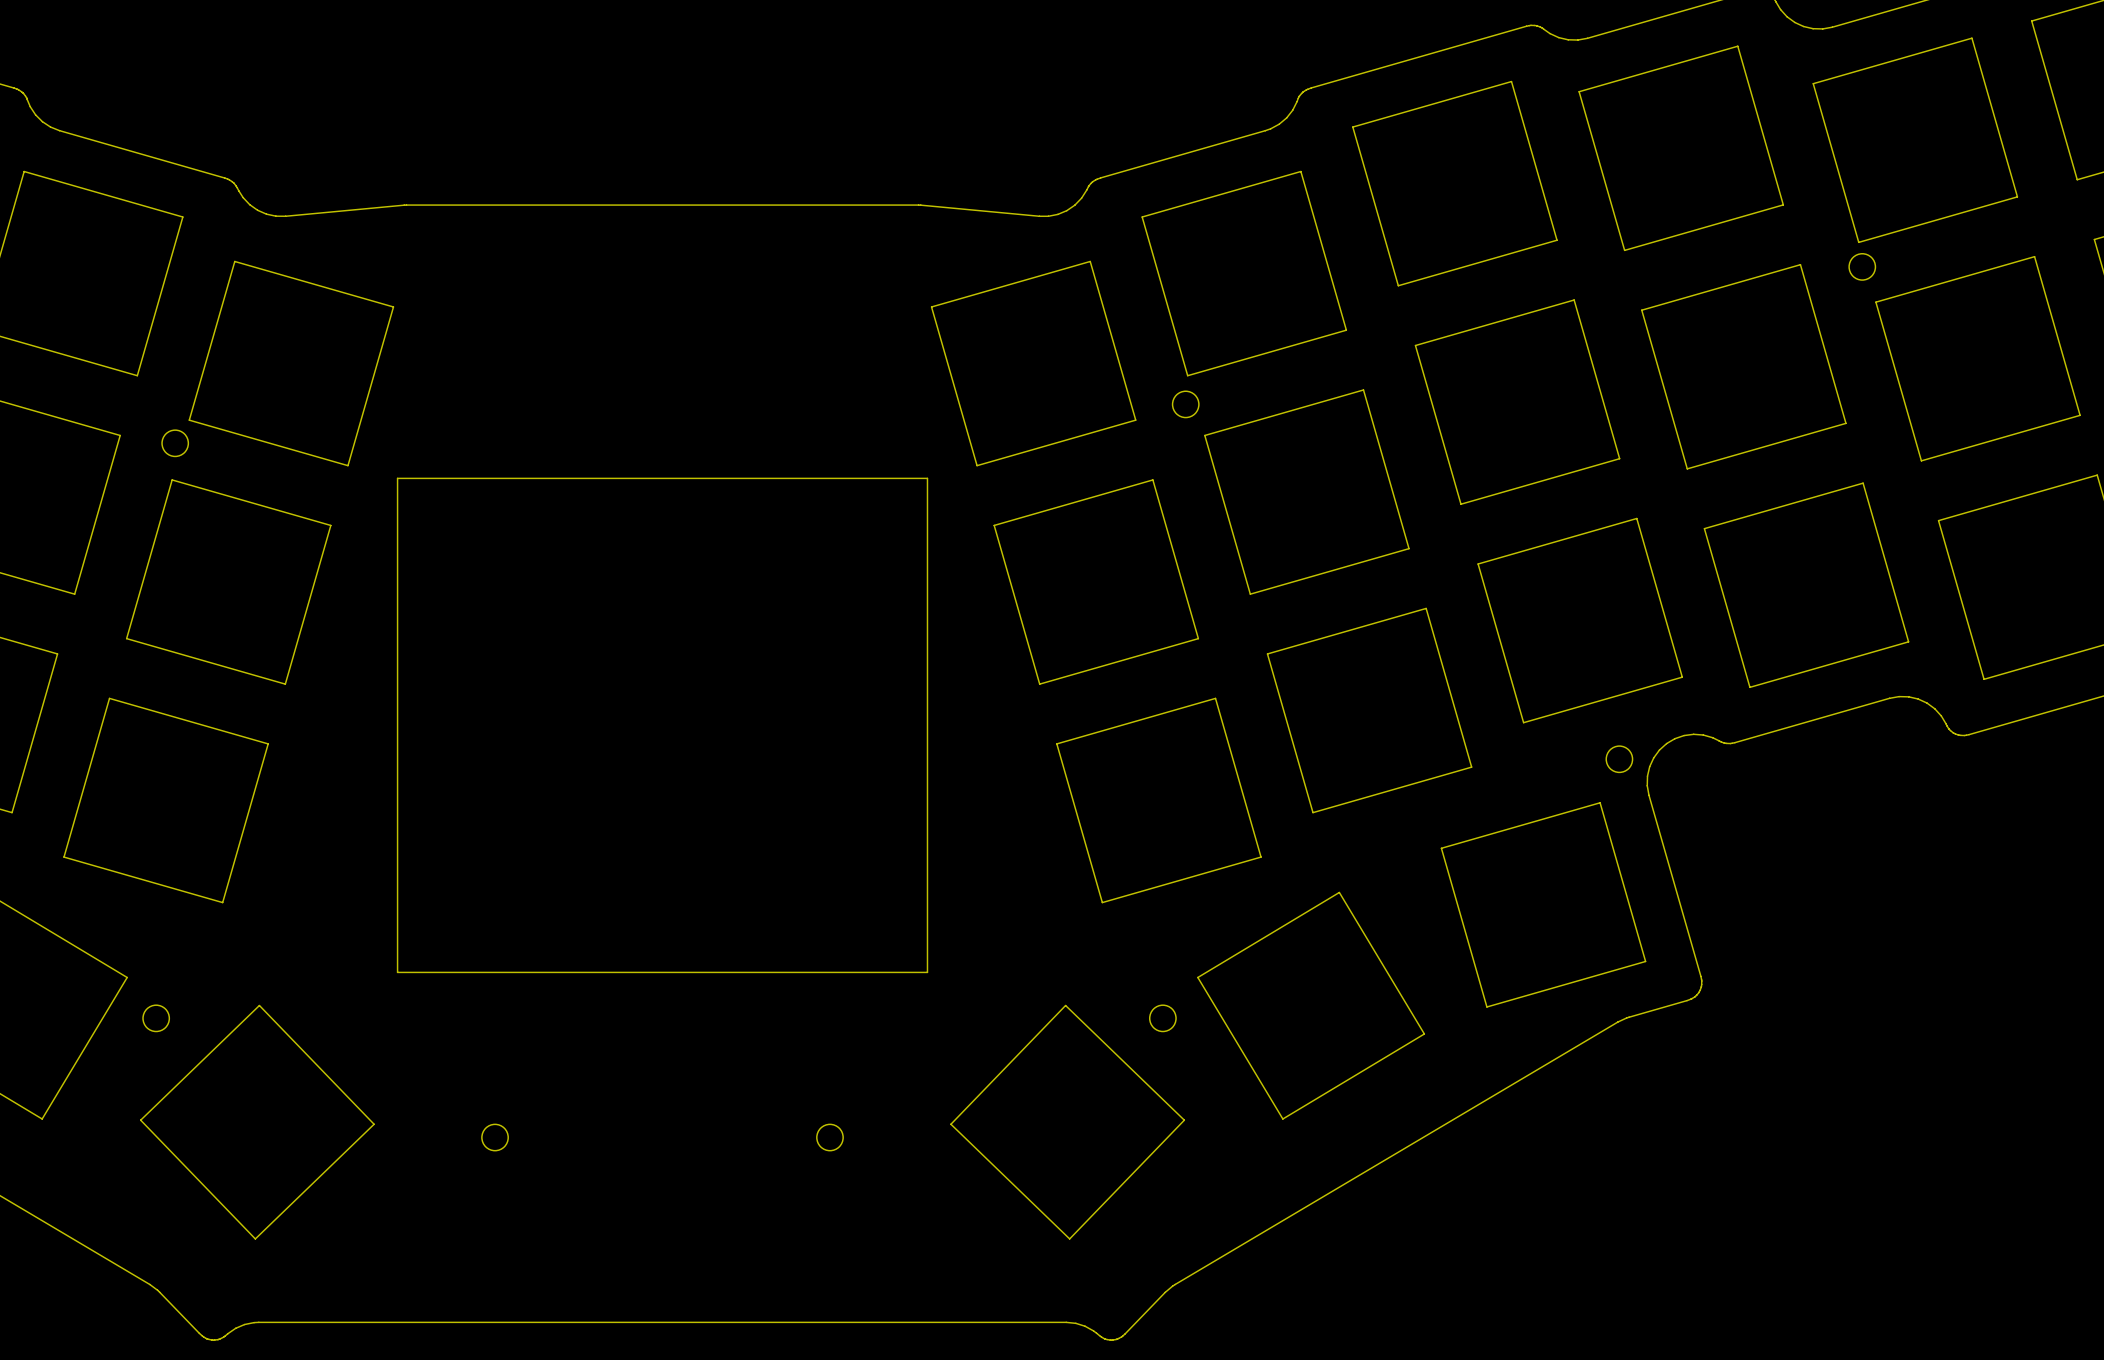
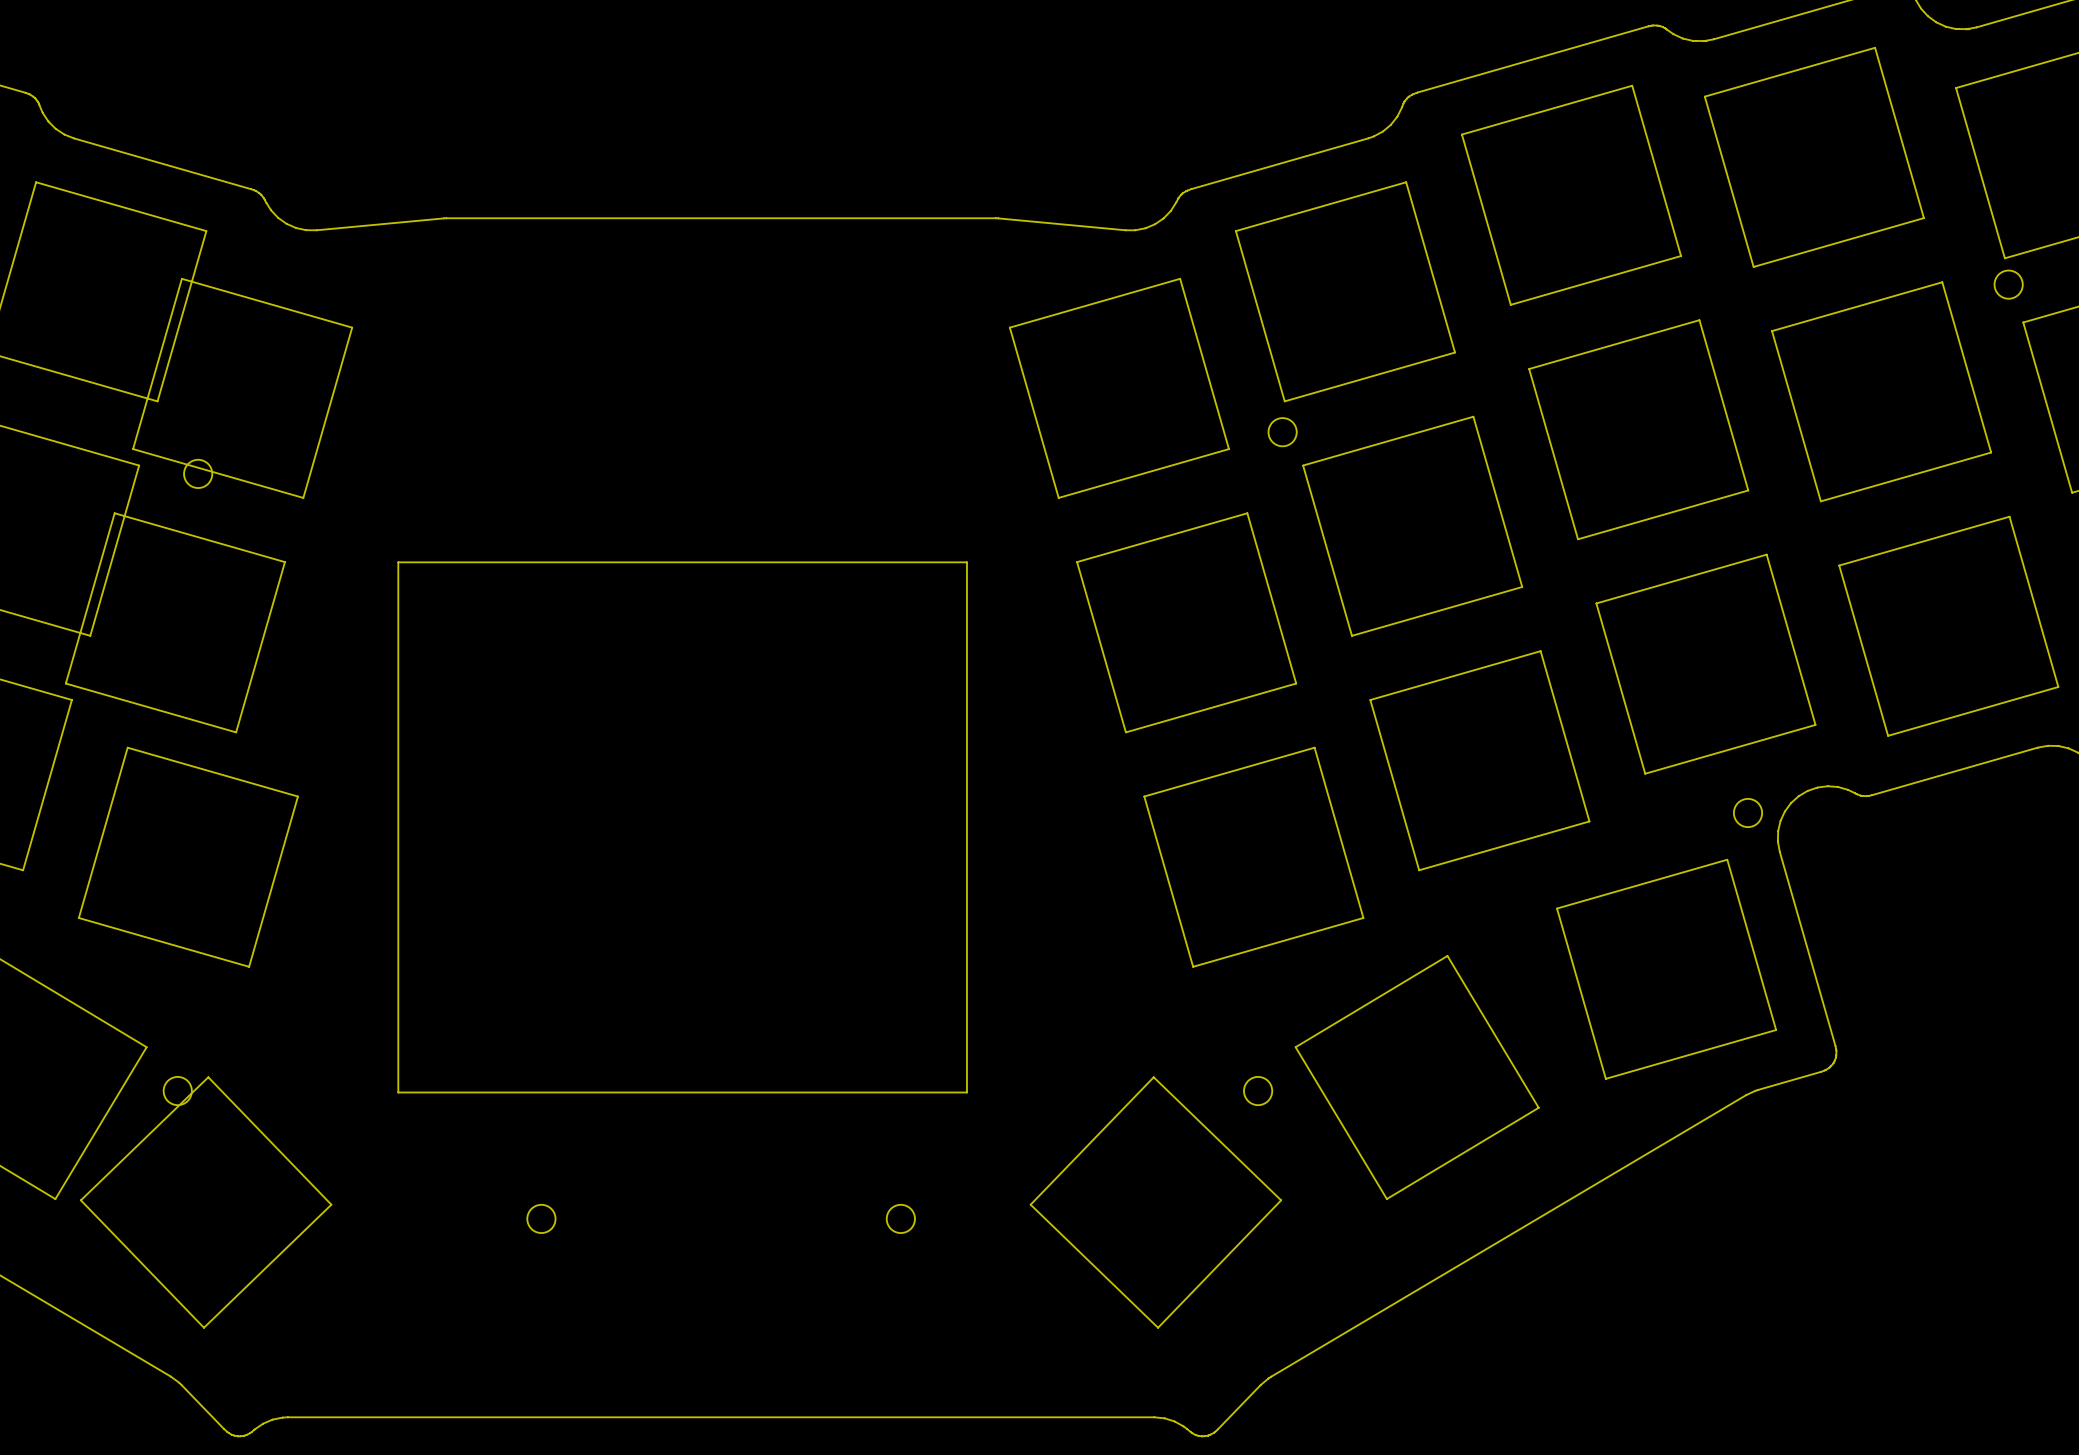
board edge: (234, 261) (393, 306) (347, 465) (189, 420) (234, 261) -> (181, 278) (352, 327) (303, 497) (133, 449) (181, 278)
board edge: (927, 478) (397, 478) (397, 972) (927, 972) (927, 478) -> (966, 562) (398, 562) (398, 1092) (966, 1092) (966, 562)
board edge: (172, 479) (126, 638) (285, 684) (330, 525) (172, 479) -> (114, 513) (65, 683) (236, 732) (284, 562) (114, 513)
board edge: (259, 1005) (140, 1120) (255, 1238) (374, 1124) (259, 1005) -> (208, 1077) (80, 1200) (203, 1327) (331, 1204) (208, 1077)

